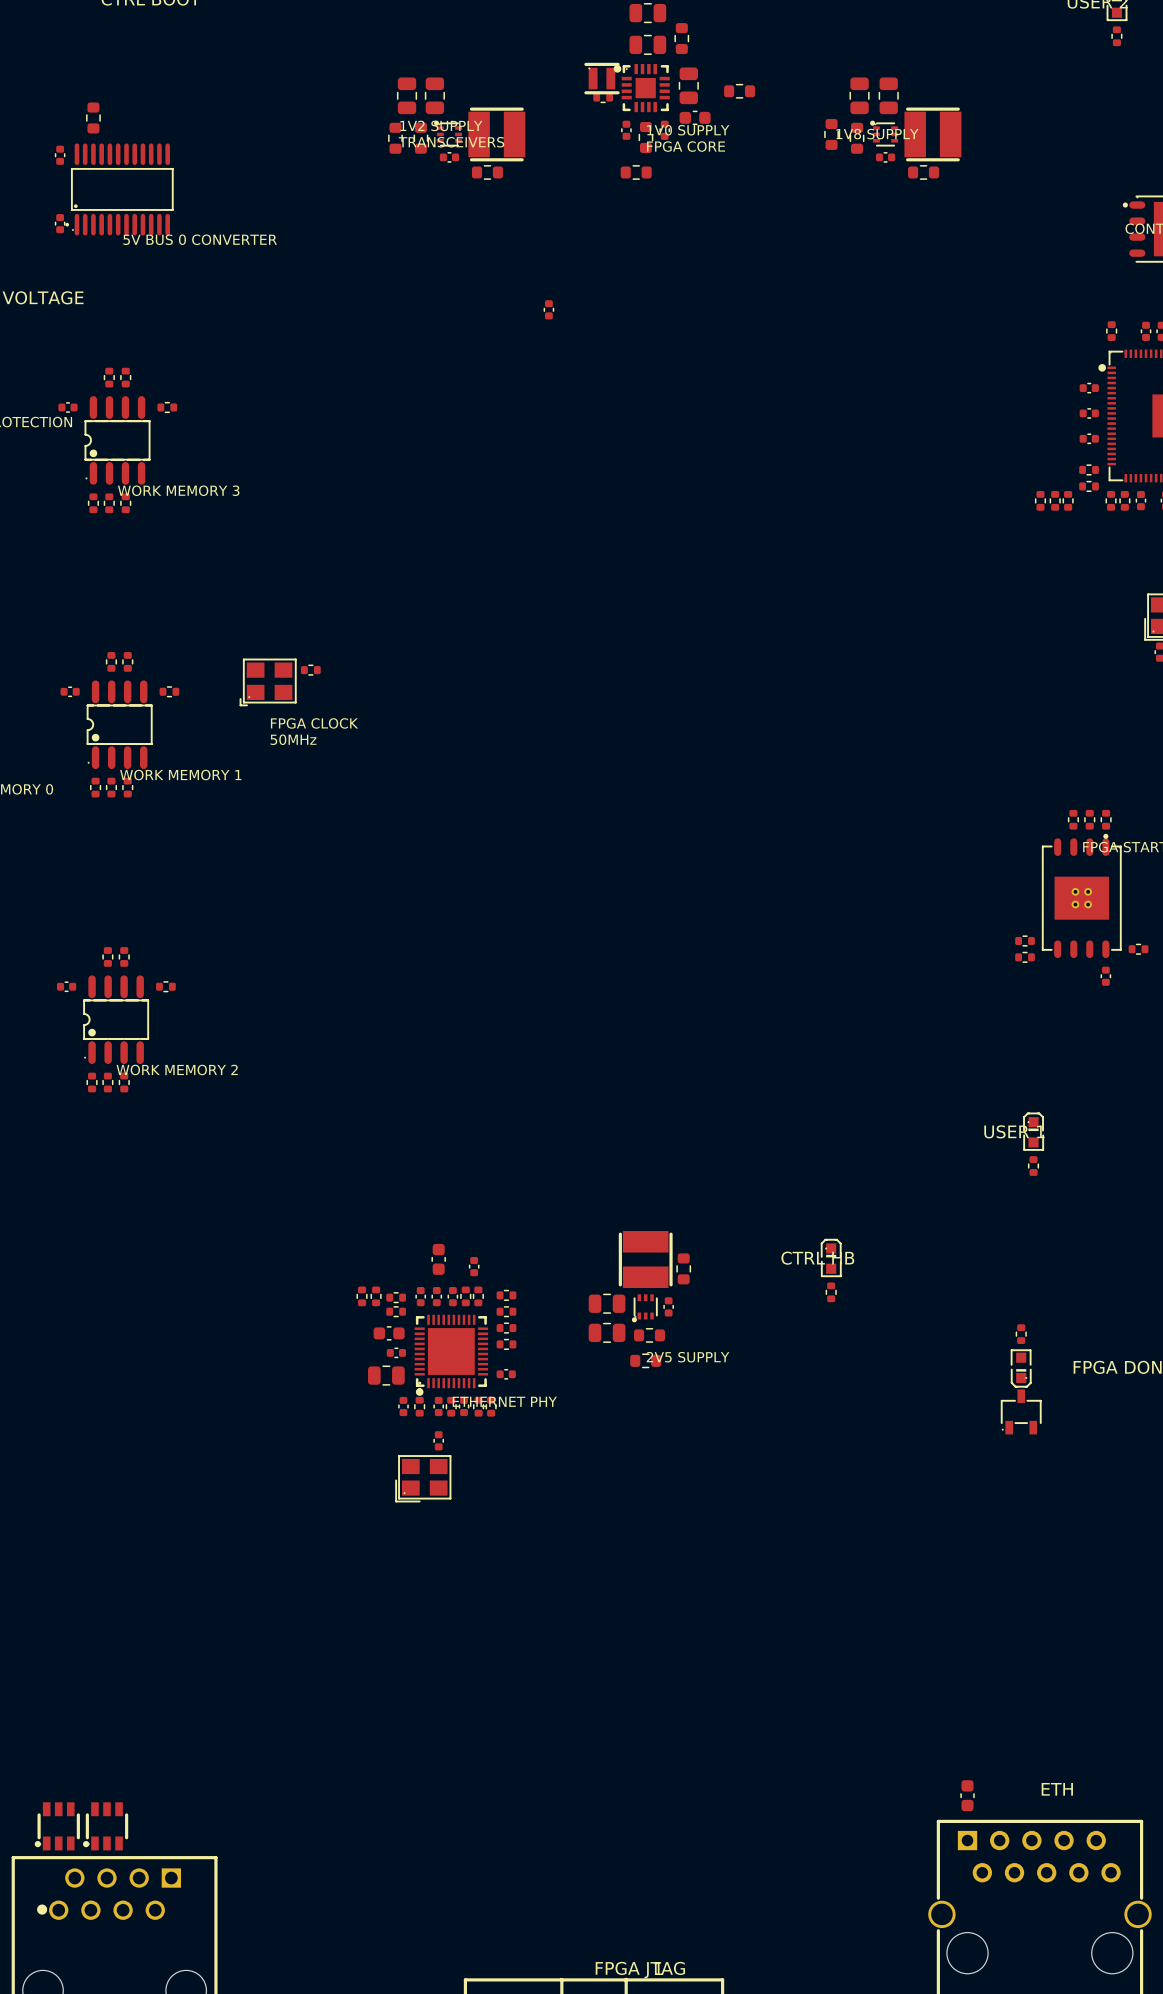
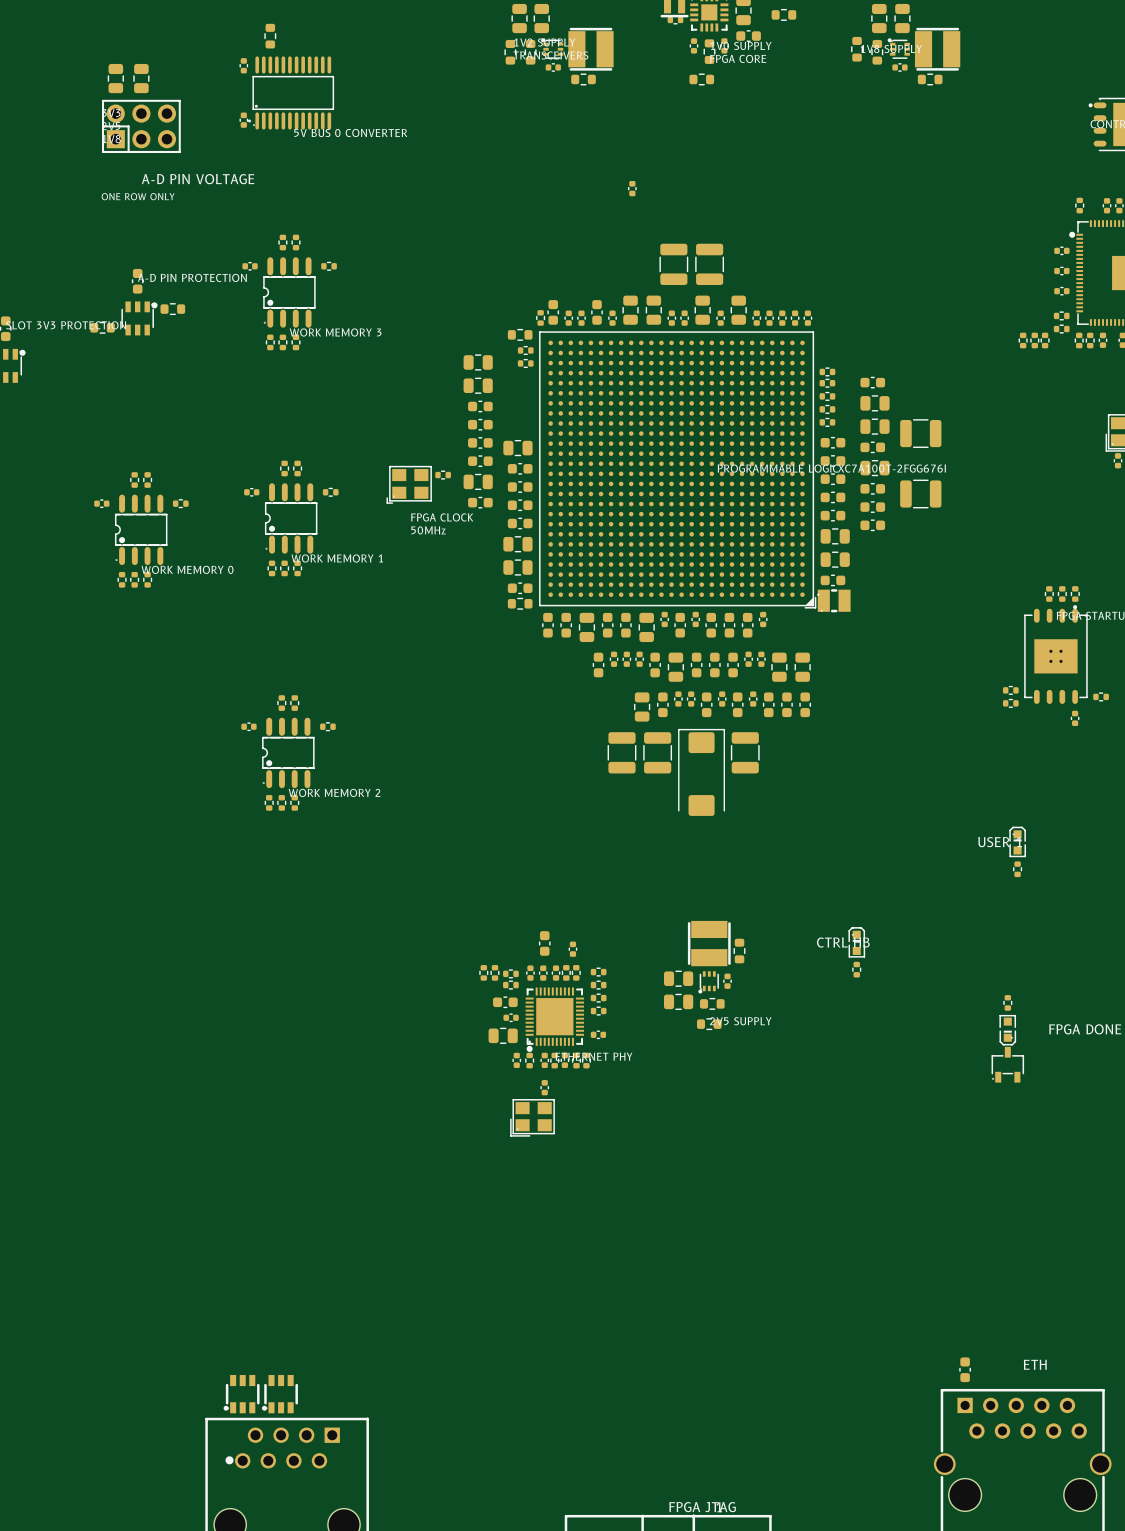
part: none -> (673, 264)
part: none -> (709, 264)
part: none -> (630, 310)
part: none -> (653, 310)
part: none -> (702, 310)
part: none -> (738, 310)
part: none -> (553, 312)
part: none -> (597, 312)
part: none -> (540, 317)
part: none -> (568, 318)
part: none -> (581, 318)
part: none -> (612, 318)
part: none -> (671, 318)
part: none -> (684, 318)
part: none -> (720, 318)
part: none -> (756, 318)
part: none -> (769, 318)
part: none -> (782, 318)
part: none -> (795, 318)
part: none -> (807, 318)
part: none -> (520, 334)
part: none -> (525, 350)
part: none -> (478, 362)
part: none -> (525, 363)
part: none -> (827, 371)
part: none -> (872, 382)
part: none -> (827, 383)
part: none -> (478, 385)
part: none -> (827, 396)
part: none -> (874, 403)
part: none -> (480, 406)
part: none -> (827, 409)
part: none -> (827, 422)
part: none -> (480, 424)
part: none -> (874, 426)
part: none -> (920, 433)
part: none -> (480, 442)
part: none -> (832, 442)
part: none -> (872, 447)
part: none -> (517, 448)
part: none -> (480, 461)
part: none -> (832, 460)
part: none -> (874, 468)
part: none -> (520, 468)
part: none -> (679, 469)
part: none -> (832, 479)
part: none -> (478, 481)
part: none -> (520, 487)
part: none -> (872, 488)
part: none -> (920, 493)
part: none -> (832, 497)
part: none -> (480, 502)
part: none -> (520, 505)
part: none -> (872, 507)
part: none -> (832, 515)
part: none -> (520, 523)
part: none -> (872, 525)
part: none -> (835, 536)
part: none -> (517, 544)
part: none -> (835, 559)
part: none -> (517, 567)
part: none -> (832, 580)
part: none -> (520, 588)
part: none -> (834, 600)
part: none -> (520, 603)
part: none -> (664, 619)
part: none -> (695, 619)
part: none -> (763, 619)
part: none -> (547, 625)
part: none -> (566, 625)
part: none -> (607, 625)
part: none -> (625, 625)
part: none -> (680, 625)
part: none -> (711, 625)
part: none -> (729, 625)
part: none -> (747, 625)
part: none -> (586, 627)
part: none -> (646, 627)
part: none -> (614, 659)
part: none -> (626, 659)
part: none -> (639, 659)
part: none -> (748, 659)
part: none -> (761, 659)
part: none -> (598, 665)
part: none -> (655, 665)
part: none -> (696, 665)
part: none -> (714, 665)
part: none -> (733, 665)
part: none -> (675, 667)
part: none -> (779, 667)
part: none -> (802, 667)
part: none -> (678, 699)
part: none -> (691, 699)
part: none -> (722, 699)
part: none -> (753, 699)
part: none -> (662, 704)
part: none -> (706, 704)
part: none -> (737, 704)
part: none -> (768, 704)
part: none -> (786, 704)
part: none -> (805, 704)
part: none -> (642, 706)
part: none -> (621, 752)
part: none -> (657, 752)
part: none -> (745, 752)
part: none -> (701, 772)

